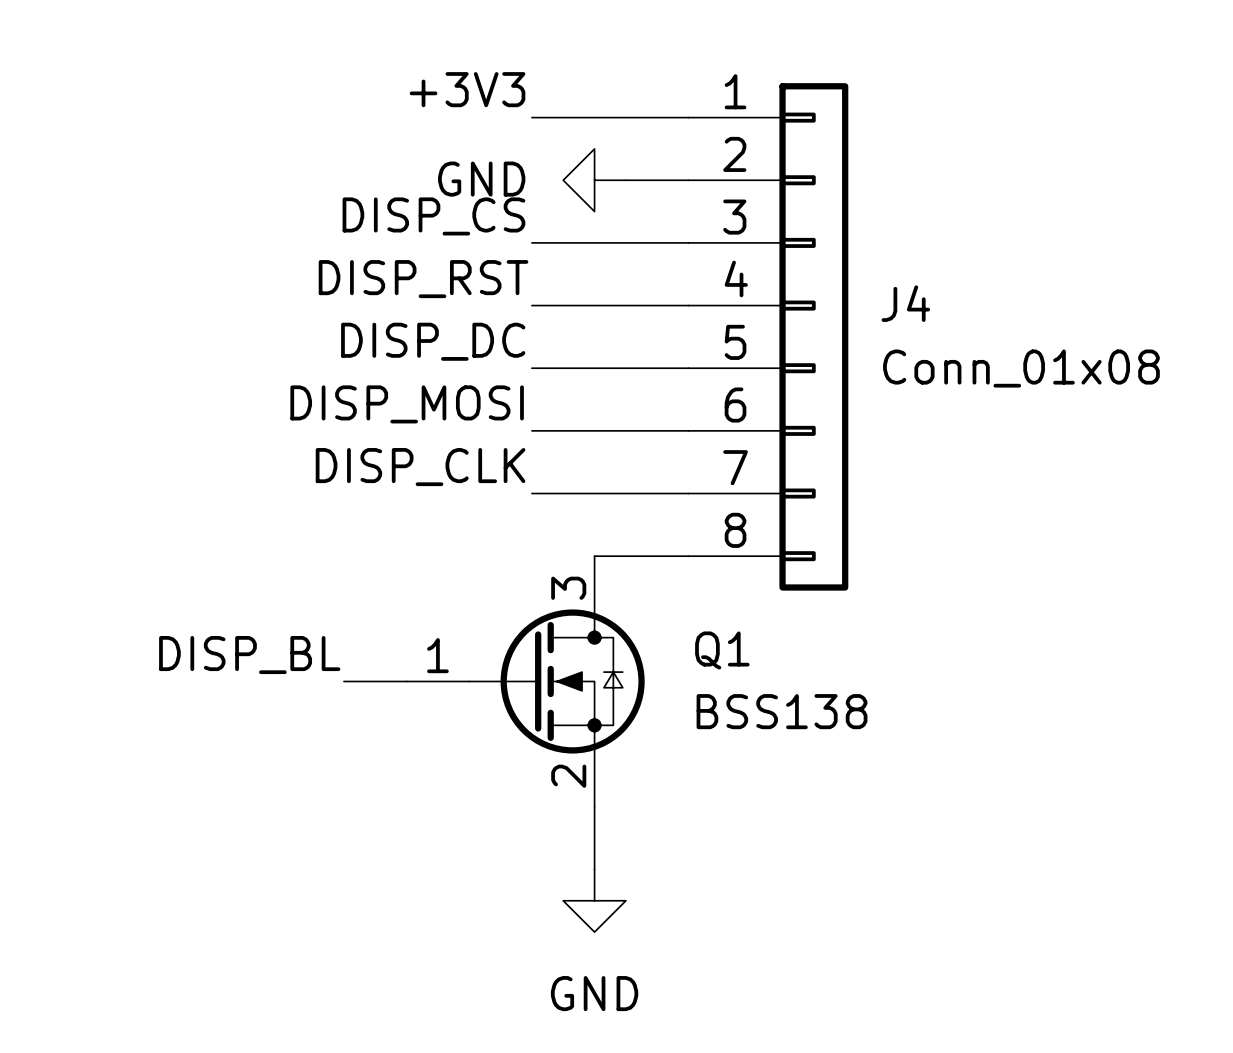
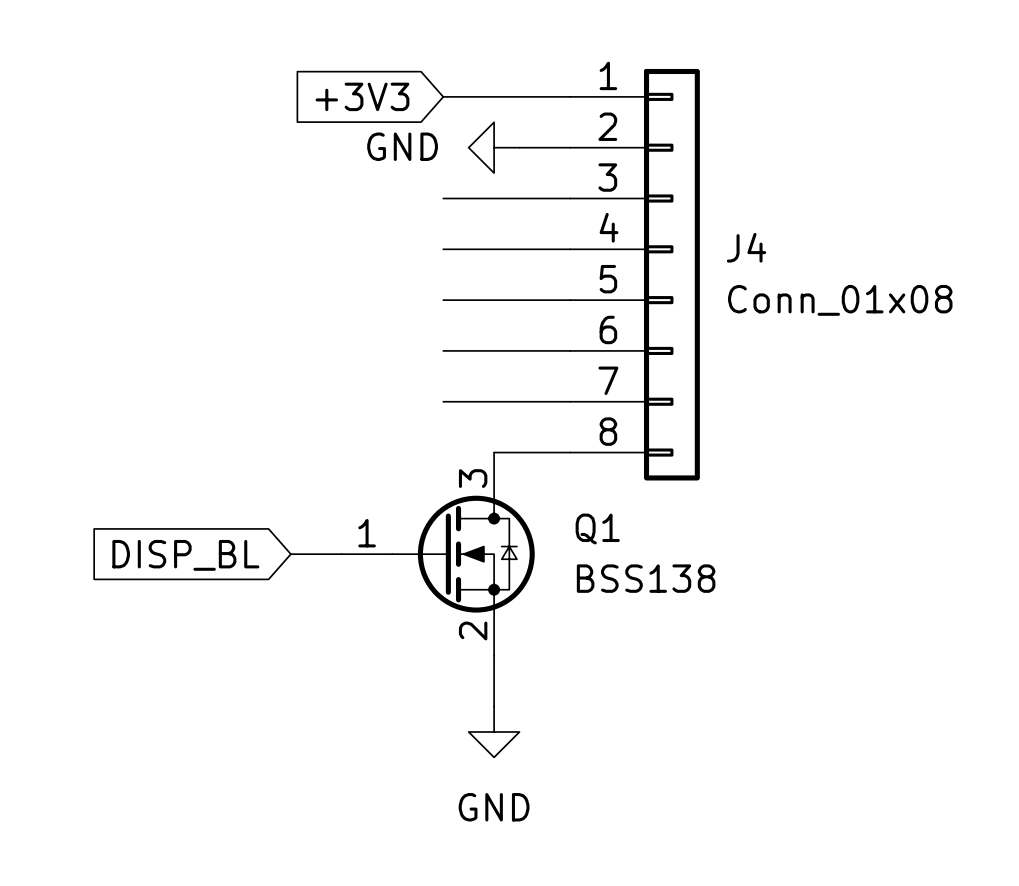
label: +3V3 (467, 89) -> none
global label: none -> +3V3 (362, 96)
label: DISP_CS (433, 216) -> none
label: DISP_RST (423, 279) -> none
label: DISP_DC (433, 341) -> none
label: DISP_MOSI (407, 404) -> none
label: DISP_CLK (420, 467) -> none
label: DISP_BL (249, 655) -> none
global label: none -> DISP_BL (185, 555)

